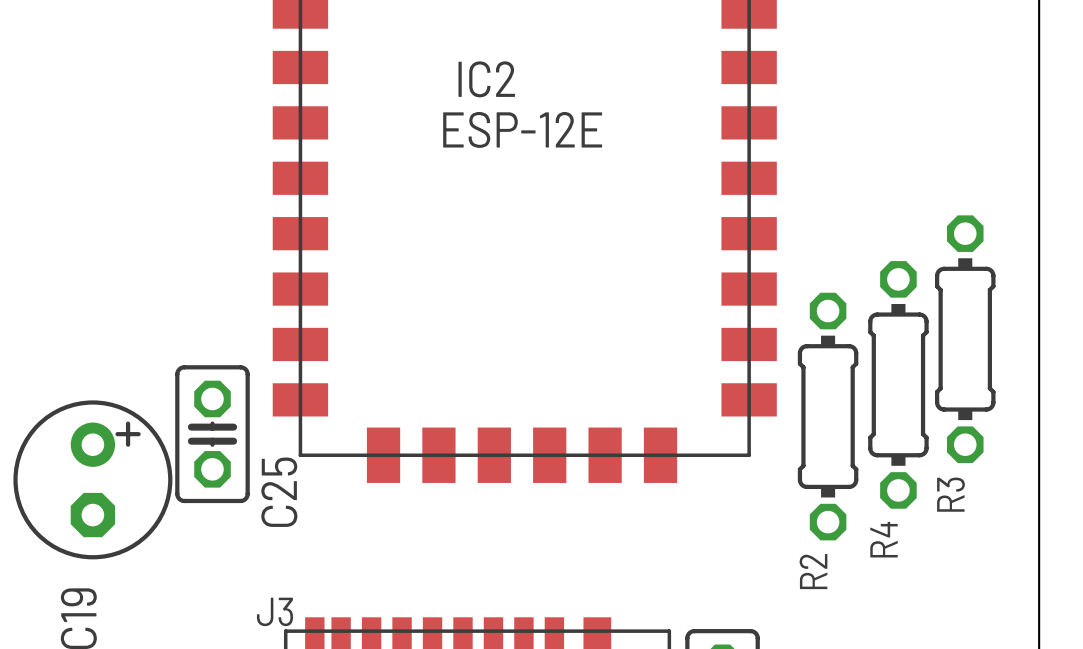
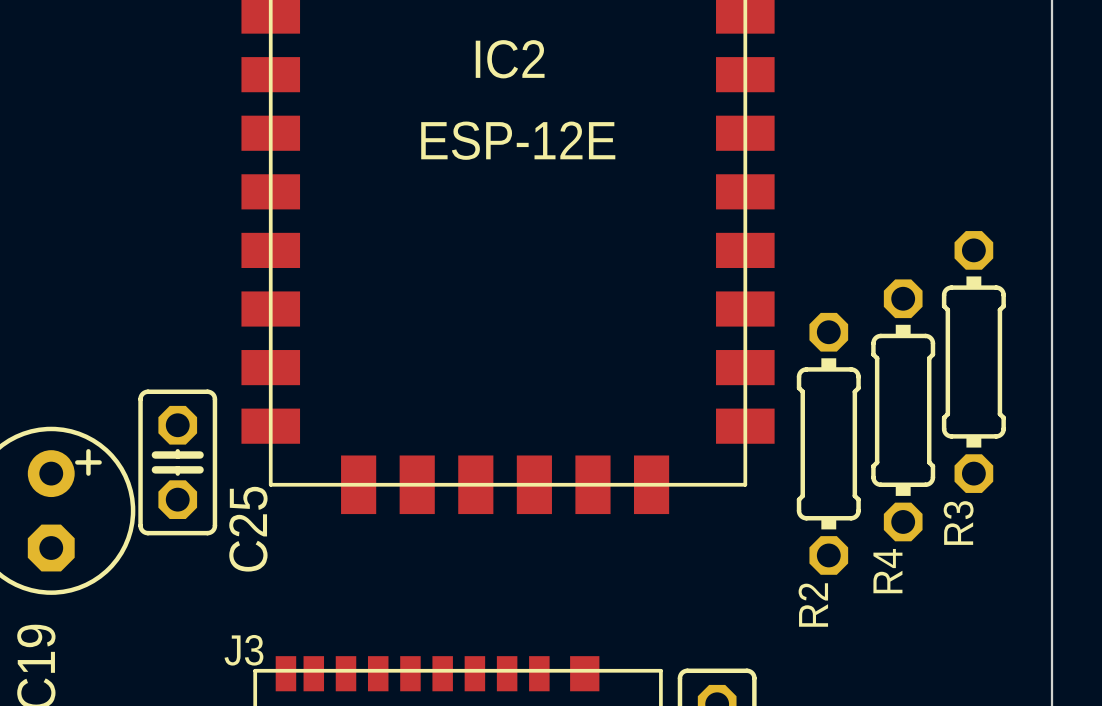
IC2 name position: IC2 (486, 79) -> IC2 (510, 59)

